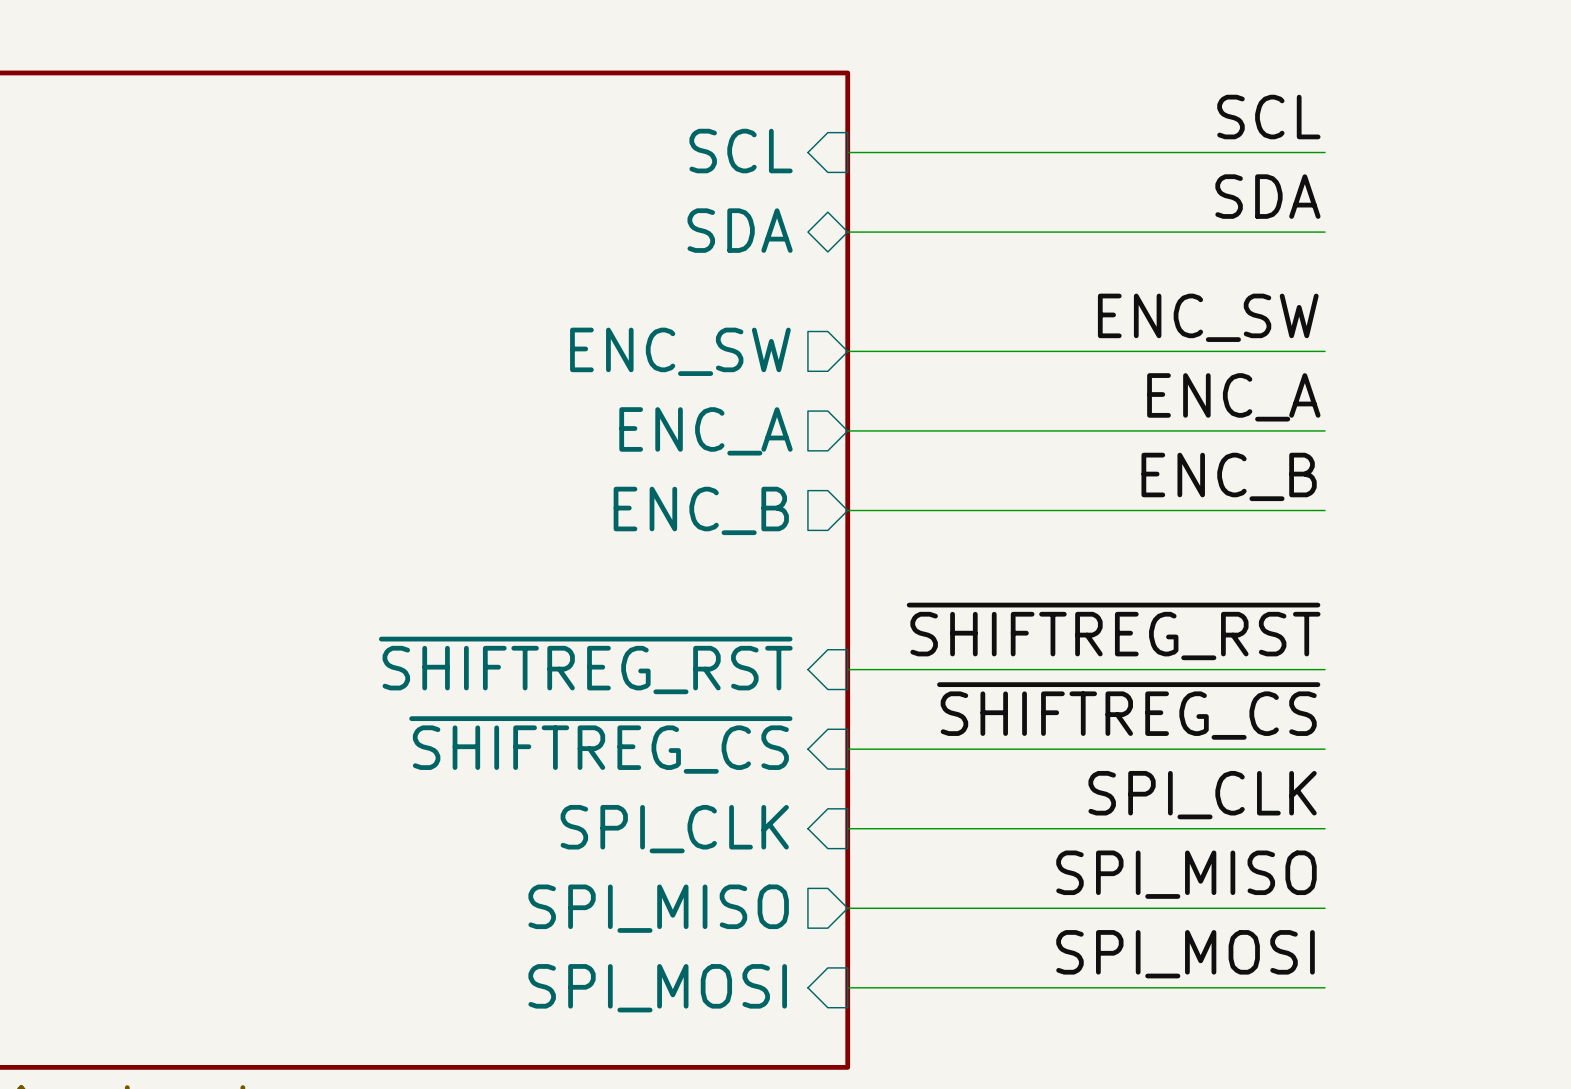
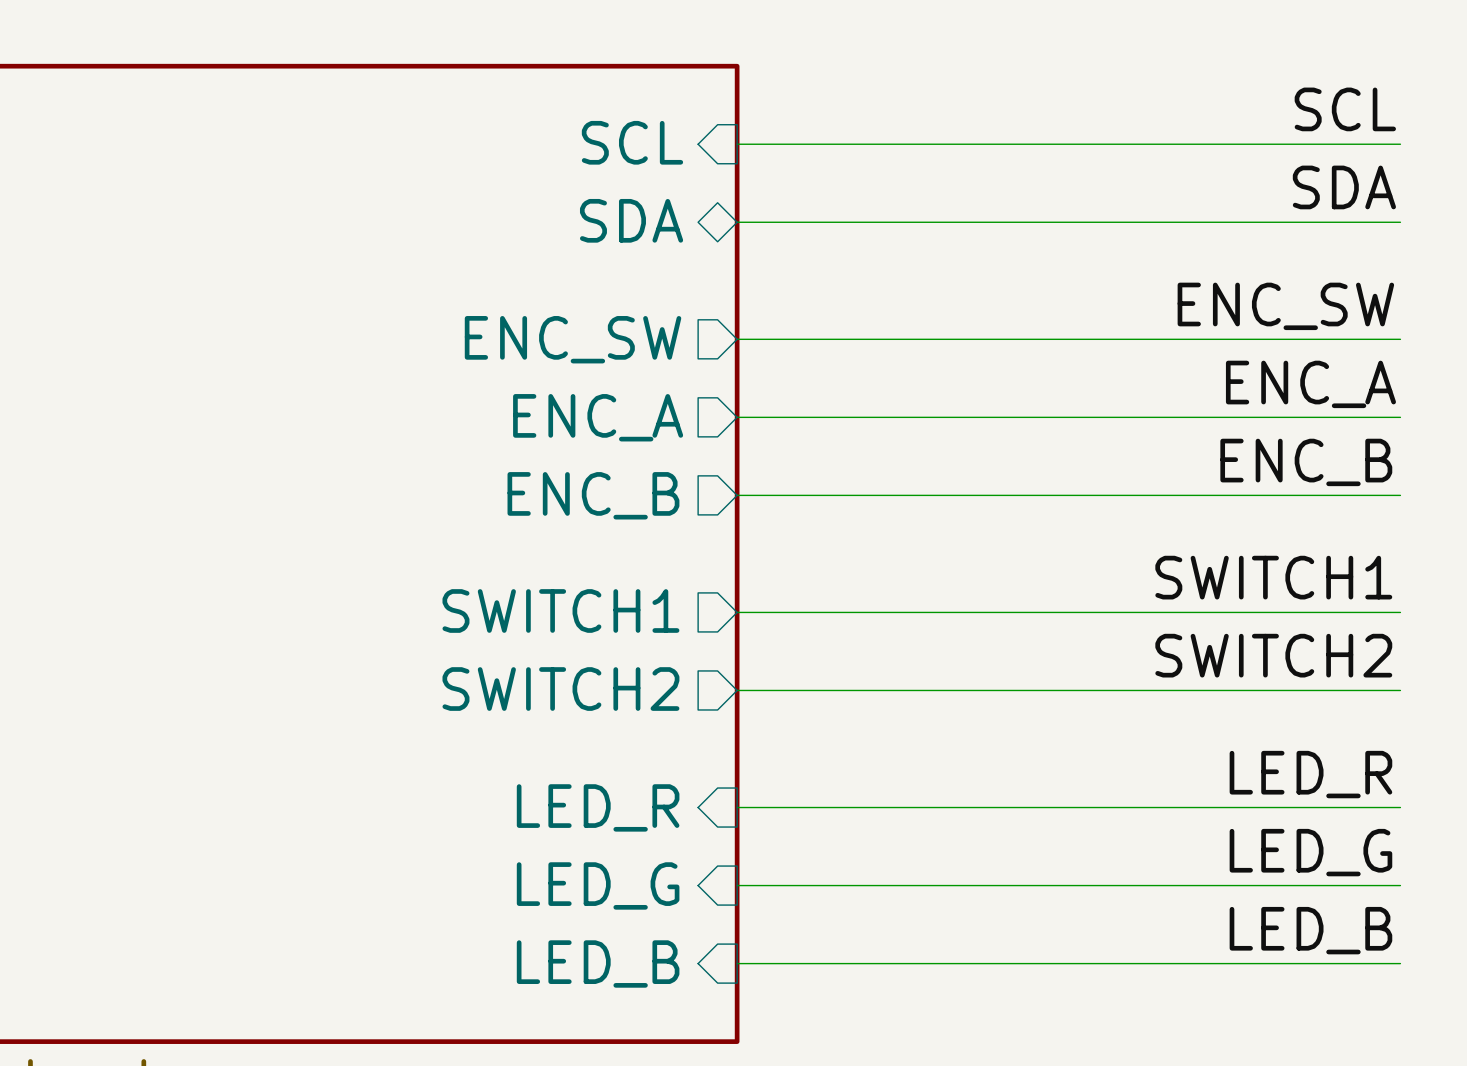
label position: SCL (1268, 117) -> SCL (1345, 109)
wire: none -> (1205, 144) (1400, 144)
label position: SDA (1267, 196) -> SDA (1344, 187)
wire: none -> (1205, 222) (1400, 222)
label position: ENC_SW (1208, 317) -> ENC_SW (1285, 306)
wire: none -> (1205, 339) (1400, 339)
label position: ENC_A (1233, 397) -> ENC_A (1310, 384)
wire: none -> (1205, 417) (1400, 417)
label position: ENC_B (1229, 476) -> ENC_B (1306, 462)
wire: none -> (1205, 495) (1400, 495)
label: none -> SWITCH1 (1273, 577)
sheet pin: none -> SWITCH1 (560, 610)
wire: none -> (737, 612) (1400, 612)
label: ~{SHIFTREG_RST} (1113, 631) -> none
sheet pin: ~{SHIFTREG_RST} (585, 665) -> none
wire: (847, 669) (1325, 669) -> none
label: none -> SWITCH2 (1273, 655)
sheet pin: none -> SWITCH2 (560, 689)
wire: none -> (737, 690) (1400, 690)
label: ~{SHIFTREG_CS} (1128, 710) -> none
sheet pin: ~{SHIFTREG_CS} (600, 745) -> none
wire: (847, 749) (1325, 749) -> none
label: SPI_CLK (1202, 795) -> none
label: none -> LED_R (1310, 774)
wire: none -> (1205, 807) (1400, 807)
sheet pin: SPI_CLK (674, 829) -> LED_R (598, 807)
label: SPI_MISO (1186, 874) -> none
label: none -> LED_G (1310, 852)
sheet pin shape: output (658, 908) -> input (598, 885)
sheet pin: SPI_MISO (658, 908) -> LED_G (598, 885)
wire: none -> (1205, 885) (1400, 885)
label: SPI_MOSI (1185, 954) -> none
label: none -> LED_B (1310, 930)
wire: none -> (1205, 963) (1400, 963)
sheet pin: SPI_MOSI (657, 988) -> LED_B (598, 963)

